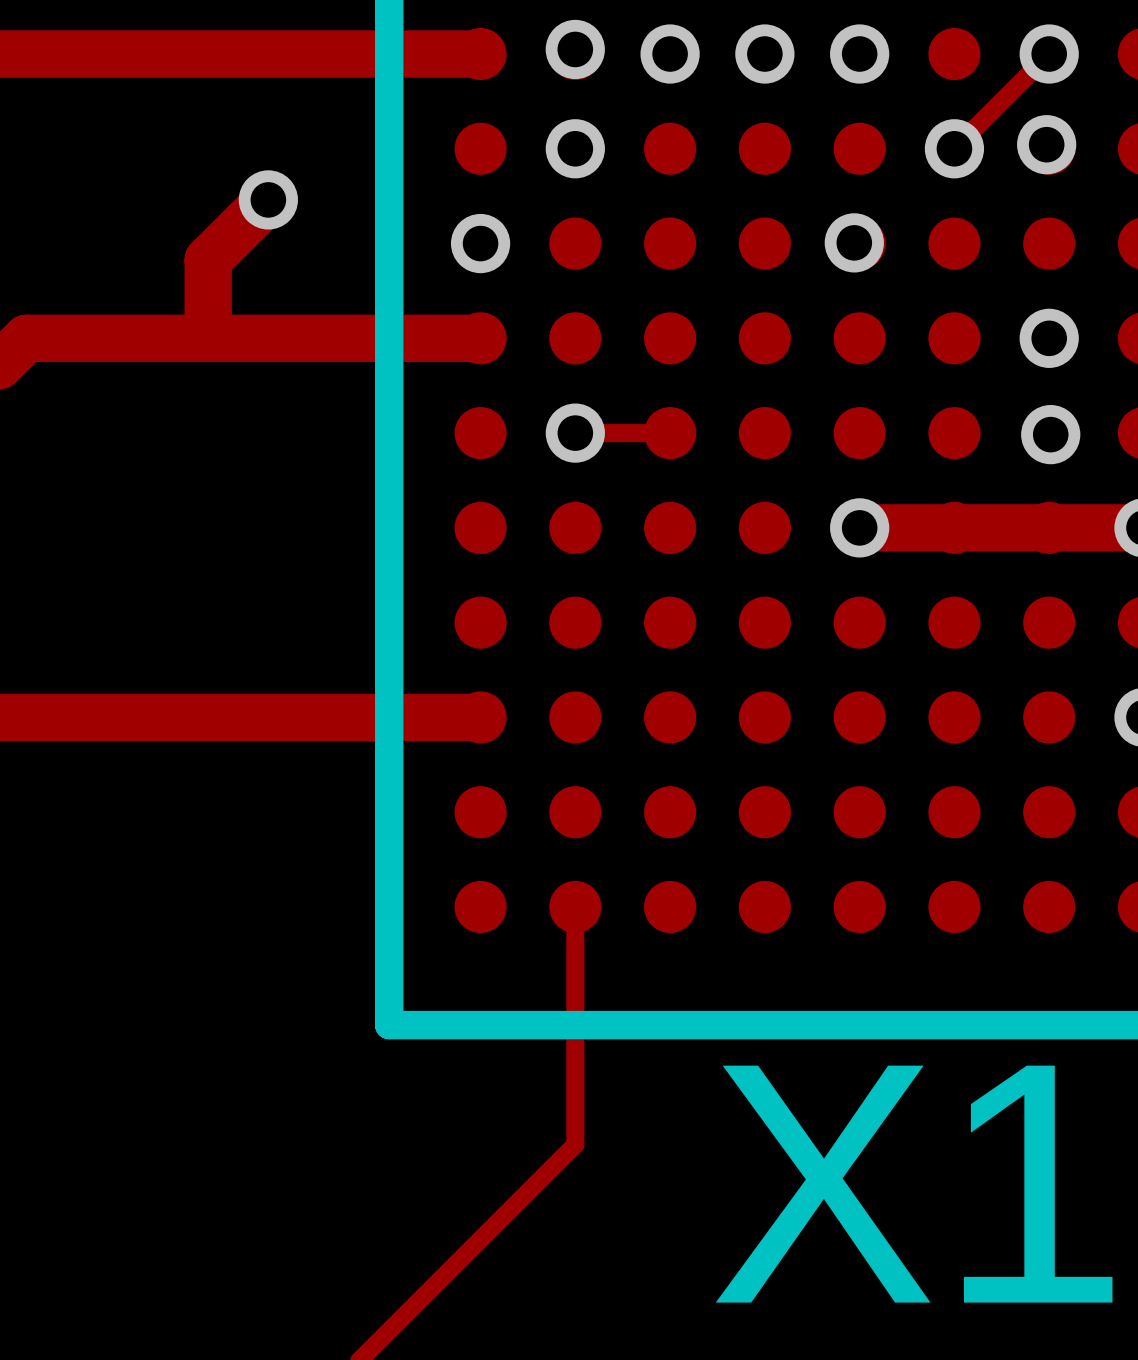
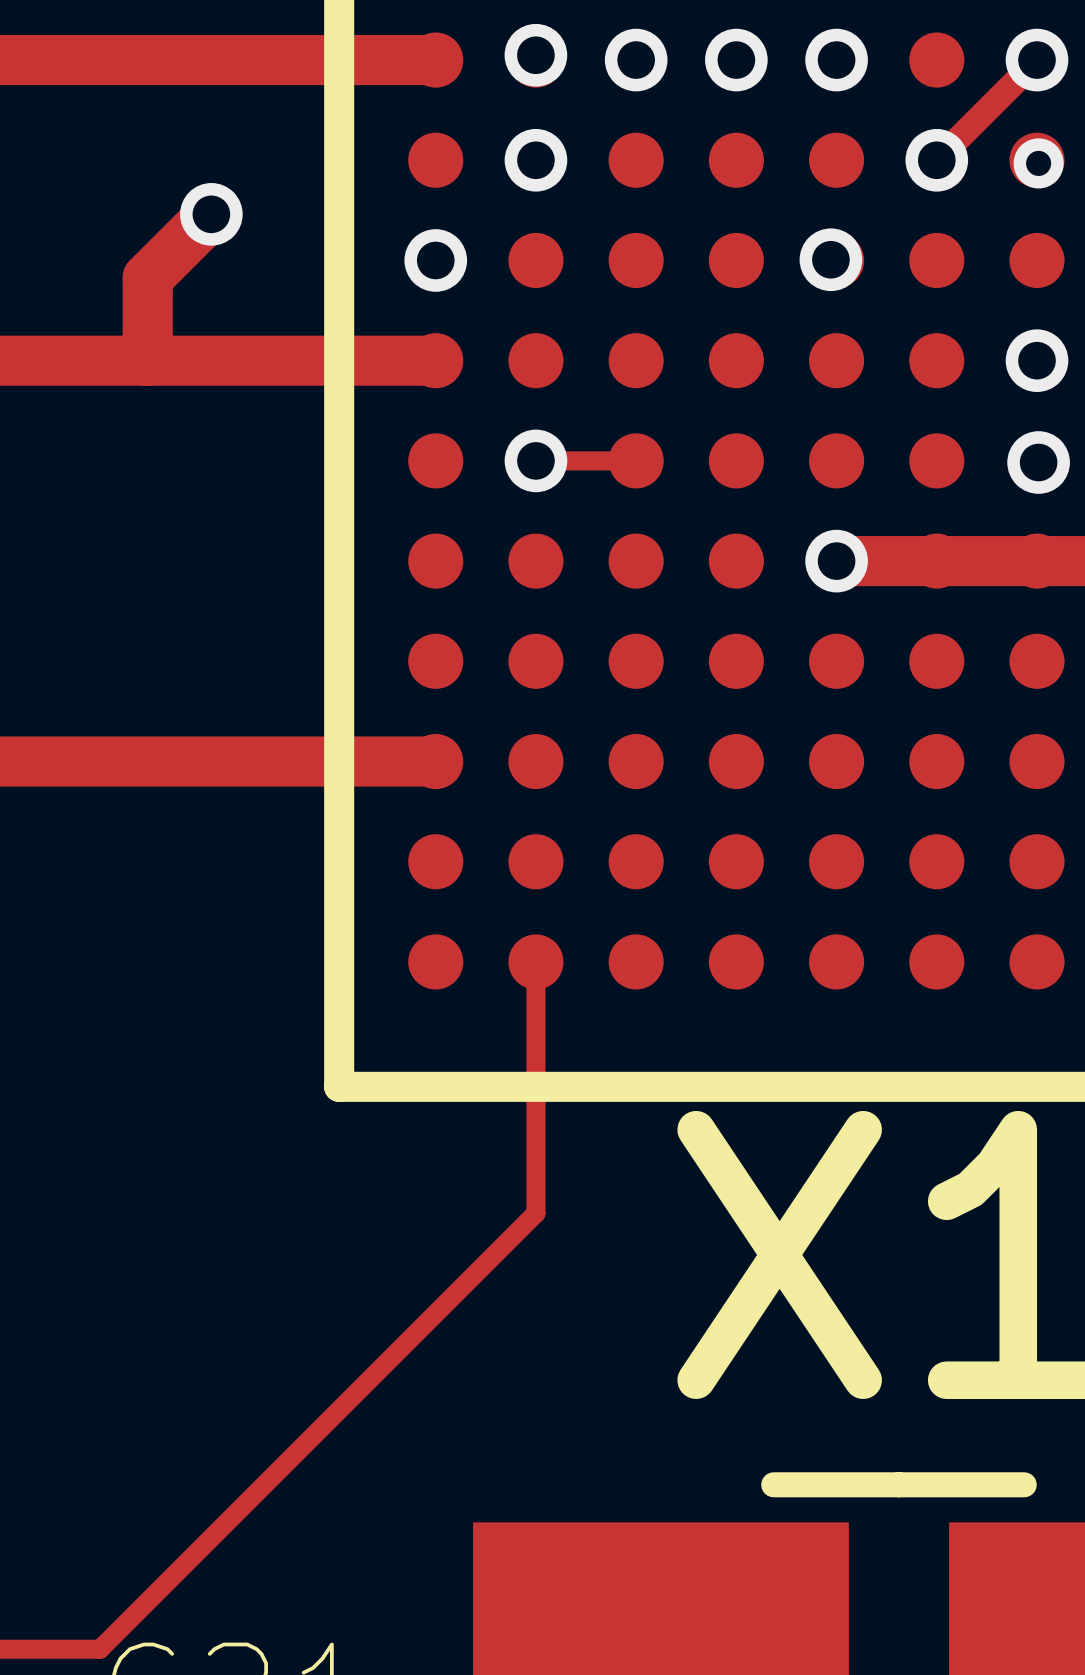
top track width: thin (1049, 54) (954, 148) -> thick (1037, 60) (936, 160)
via size: [1017, 115, 1077, 175] -> [1013, 138, 1064, 189]

